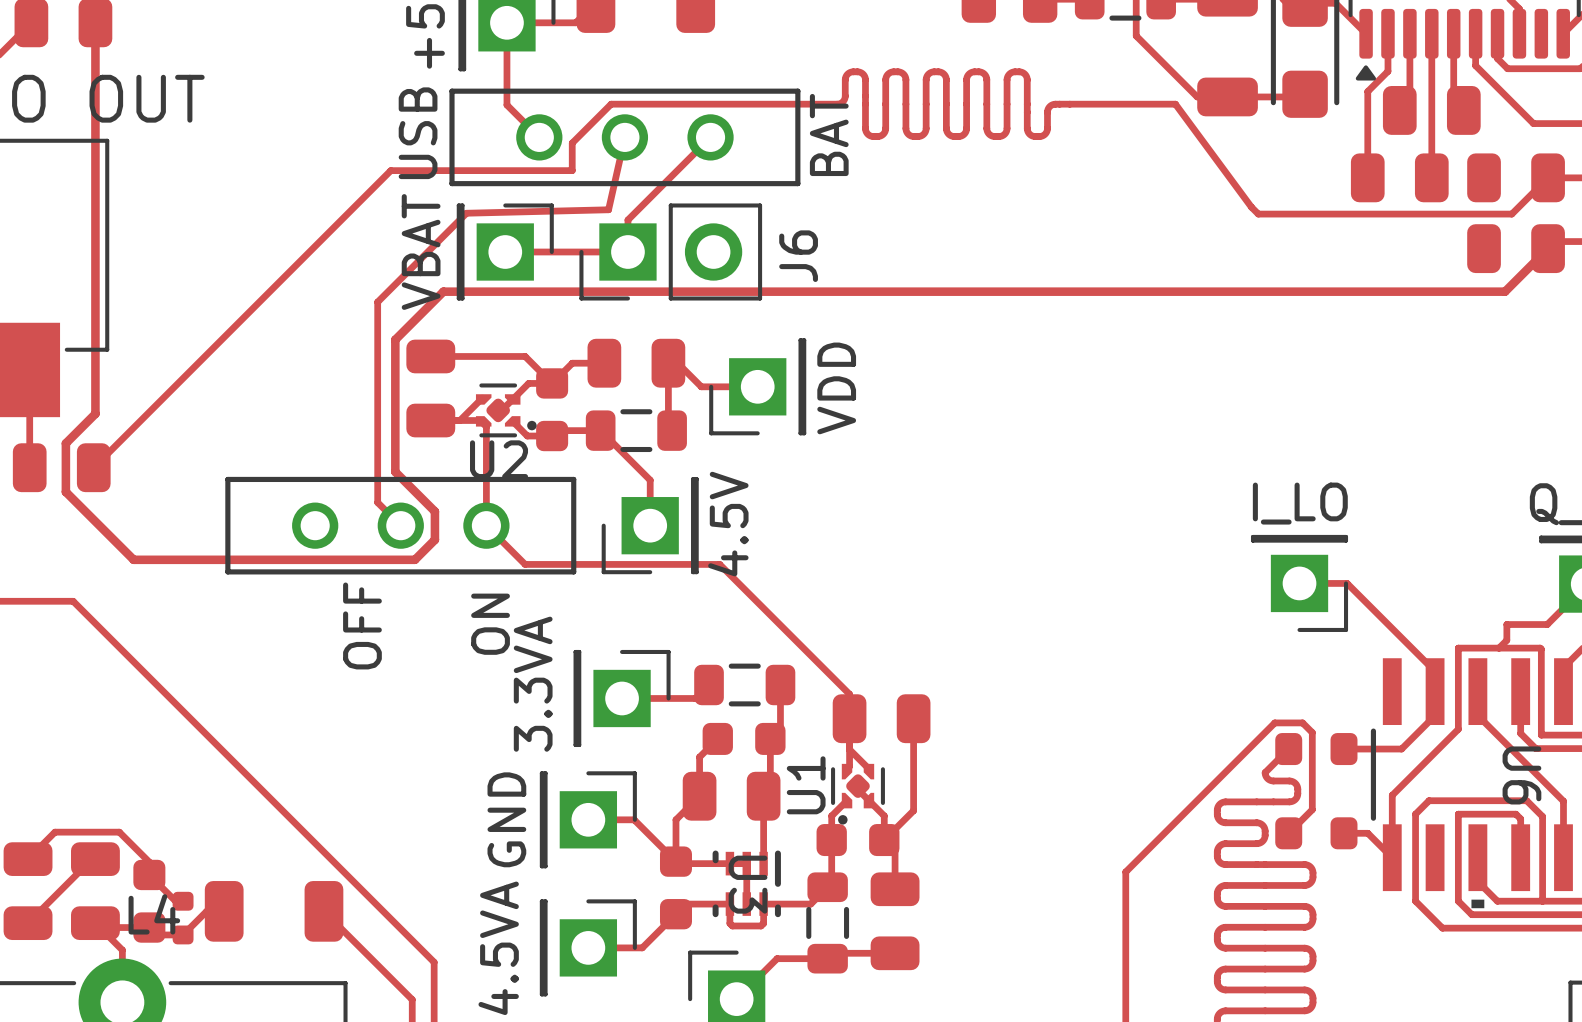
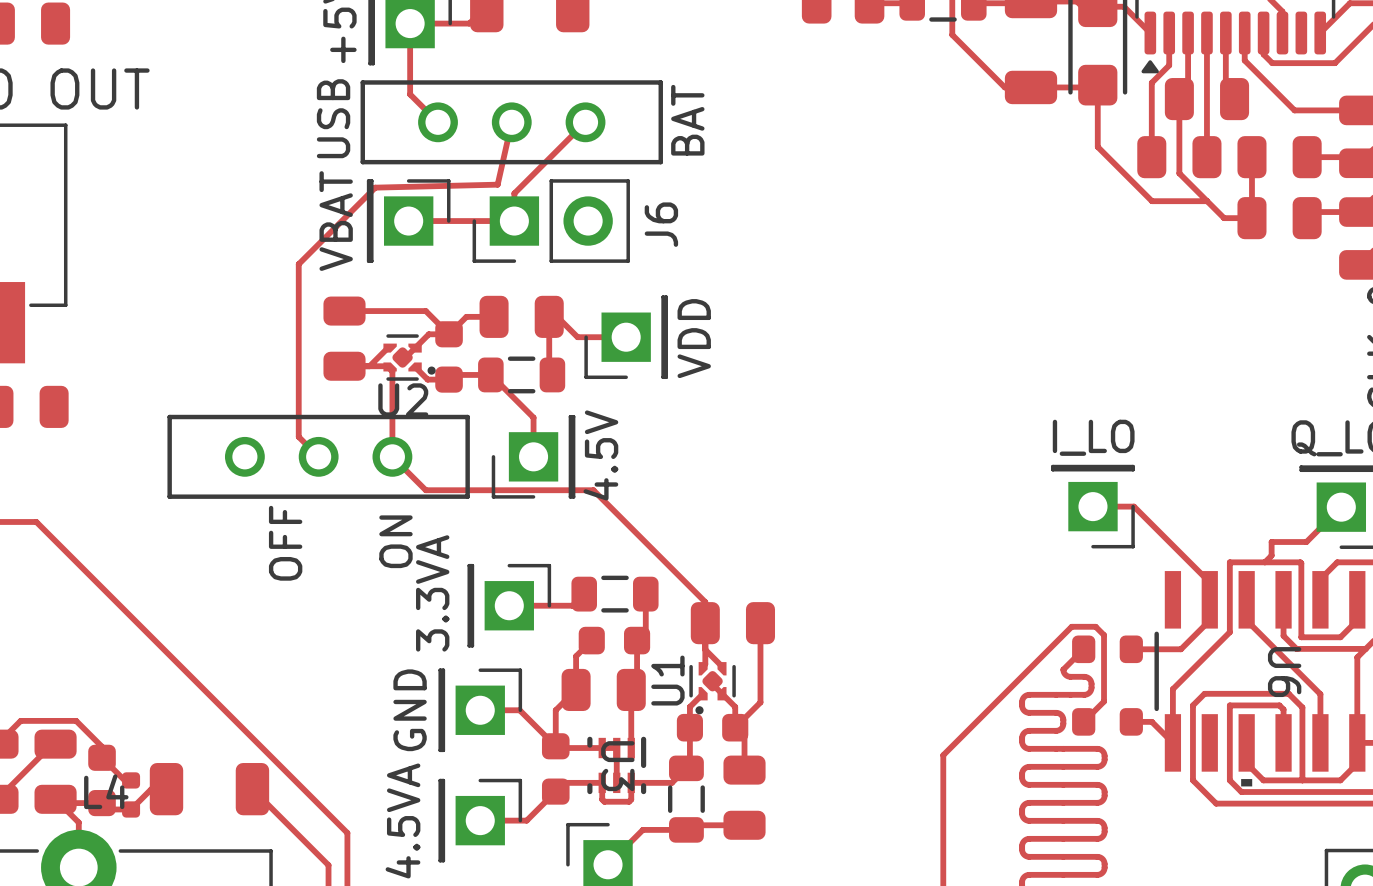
track: (95, 22) (95, 413) (65, 443) (65, 492) (133, 559) (414, 559) (434, 539) (434, 511) (395, 471) (395, 339) (443, 291) (1505, 291) (1548, 248) -> none
track: none -> (1097, 85) (1097, 146) (1151, 201) (1207, 201)
track: none -> (1179, 99) (1179, 173) (1224, 218) (1251, 218) (1251, 157)
track: (1548, 177) (1511, 214) (1258, 214) (1175, 104) (1053, 104) (1047, 110) (1046, 132) (1041, 136) (1033, 136) (1027, 129) (1027, 78) (1020, 71) (1011, 72) (1007, 77) (1006, 129) (1004, 134) (999, 136) (991, 135) (987, 131) (986, 79) (984, 74) (979, 71) (971, 72) (967, 77) (966, 129) (964, 134) (959, 136) (950, 135) (946, 131) (946, 79) (944, 74) (939, 71) (930, 72) (926, 77) (926, 129) (923, 134) (918, 136) (910, 135) (906, 131) (905, 79) (903, 74) (898, 71) (890, 72) (886, 77) (885, 129) (883, 134) (878, 136) (870, 135) (865, 131) (865, 79) (863, 74) (858, 71) (850, 72) (846, 75) (844, 98) (838, 104) (611, 104) (572, 143) (572, 170) (390, 170) (93, 467) -> none

